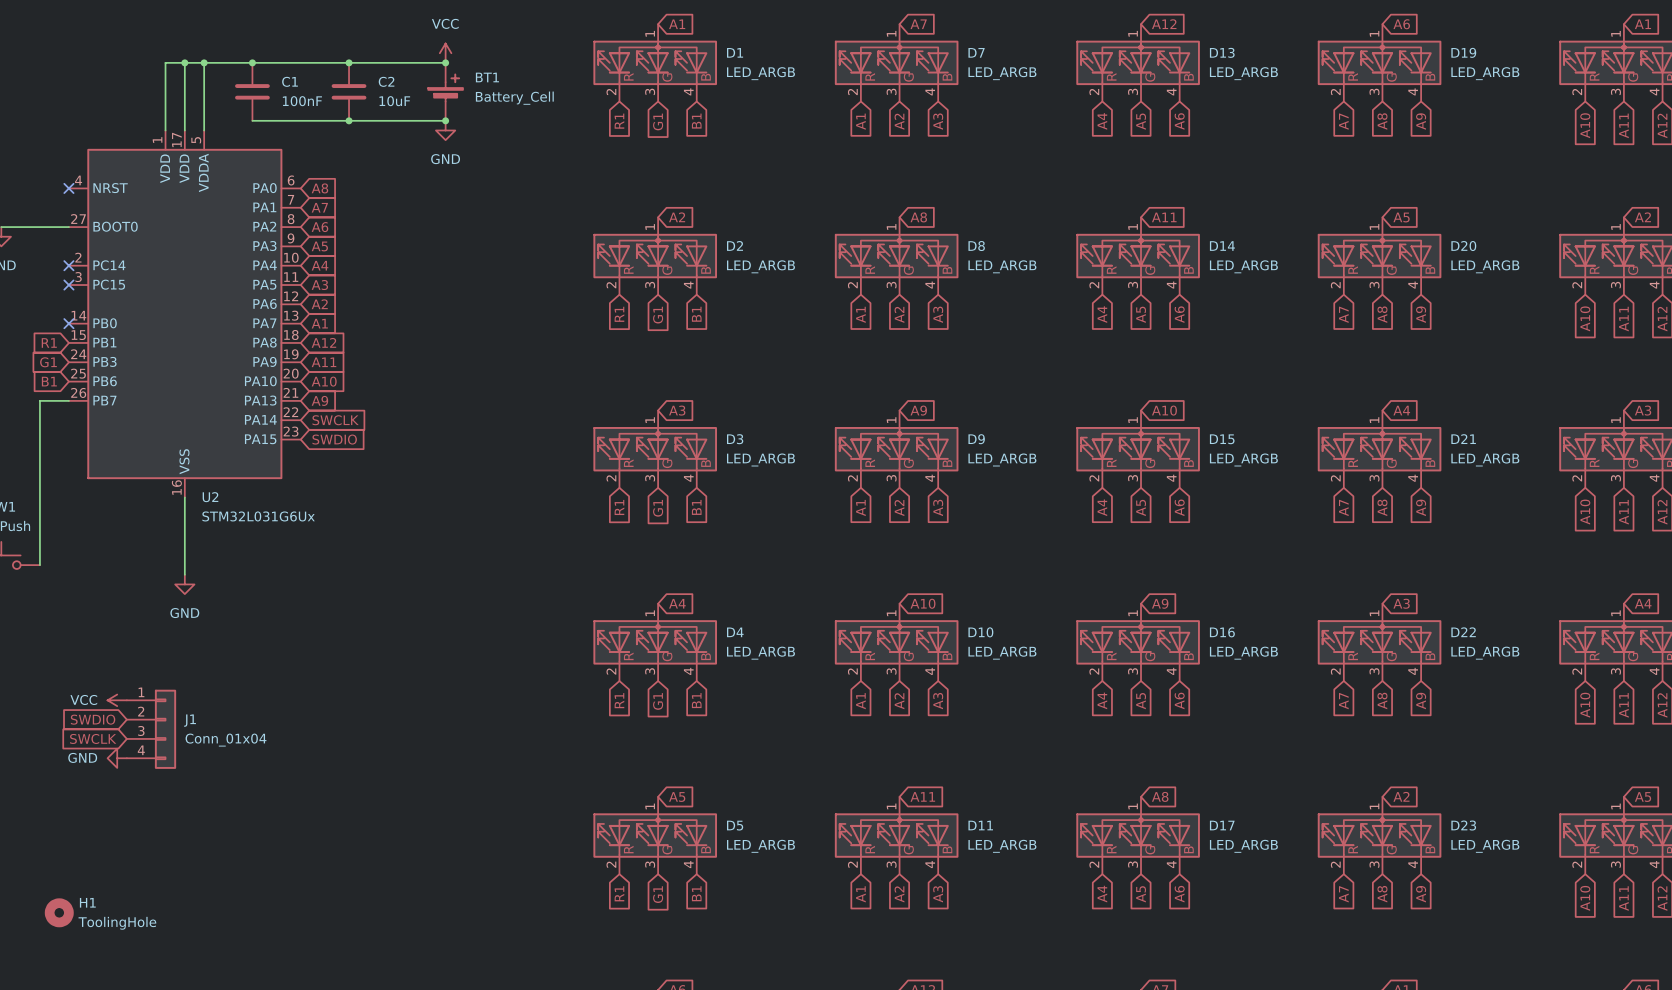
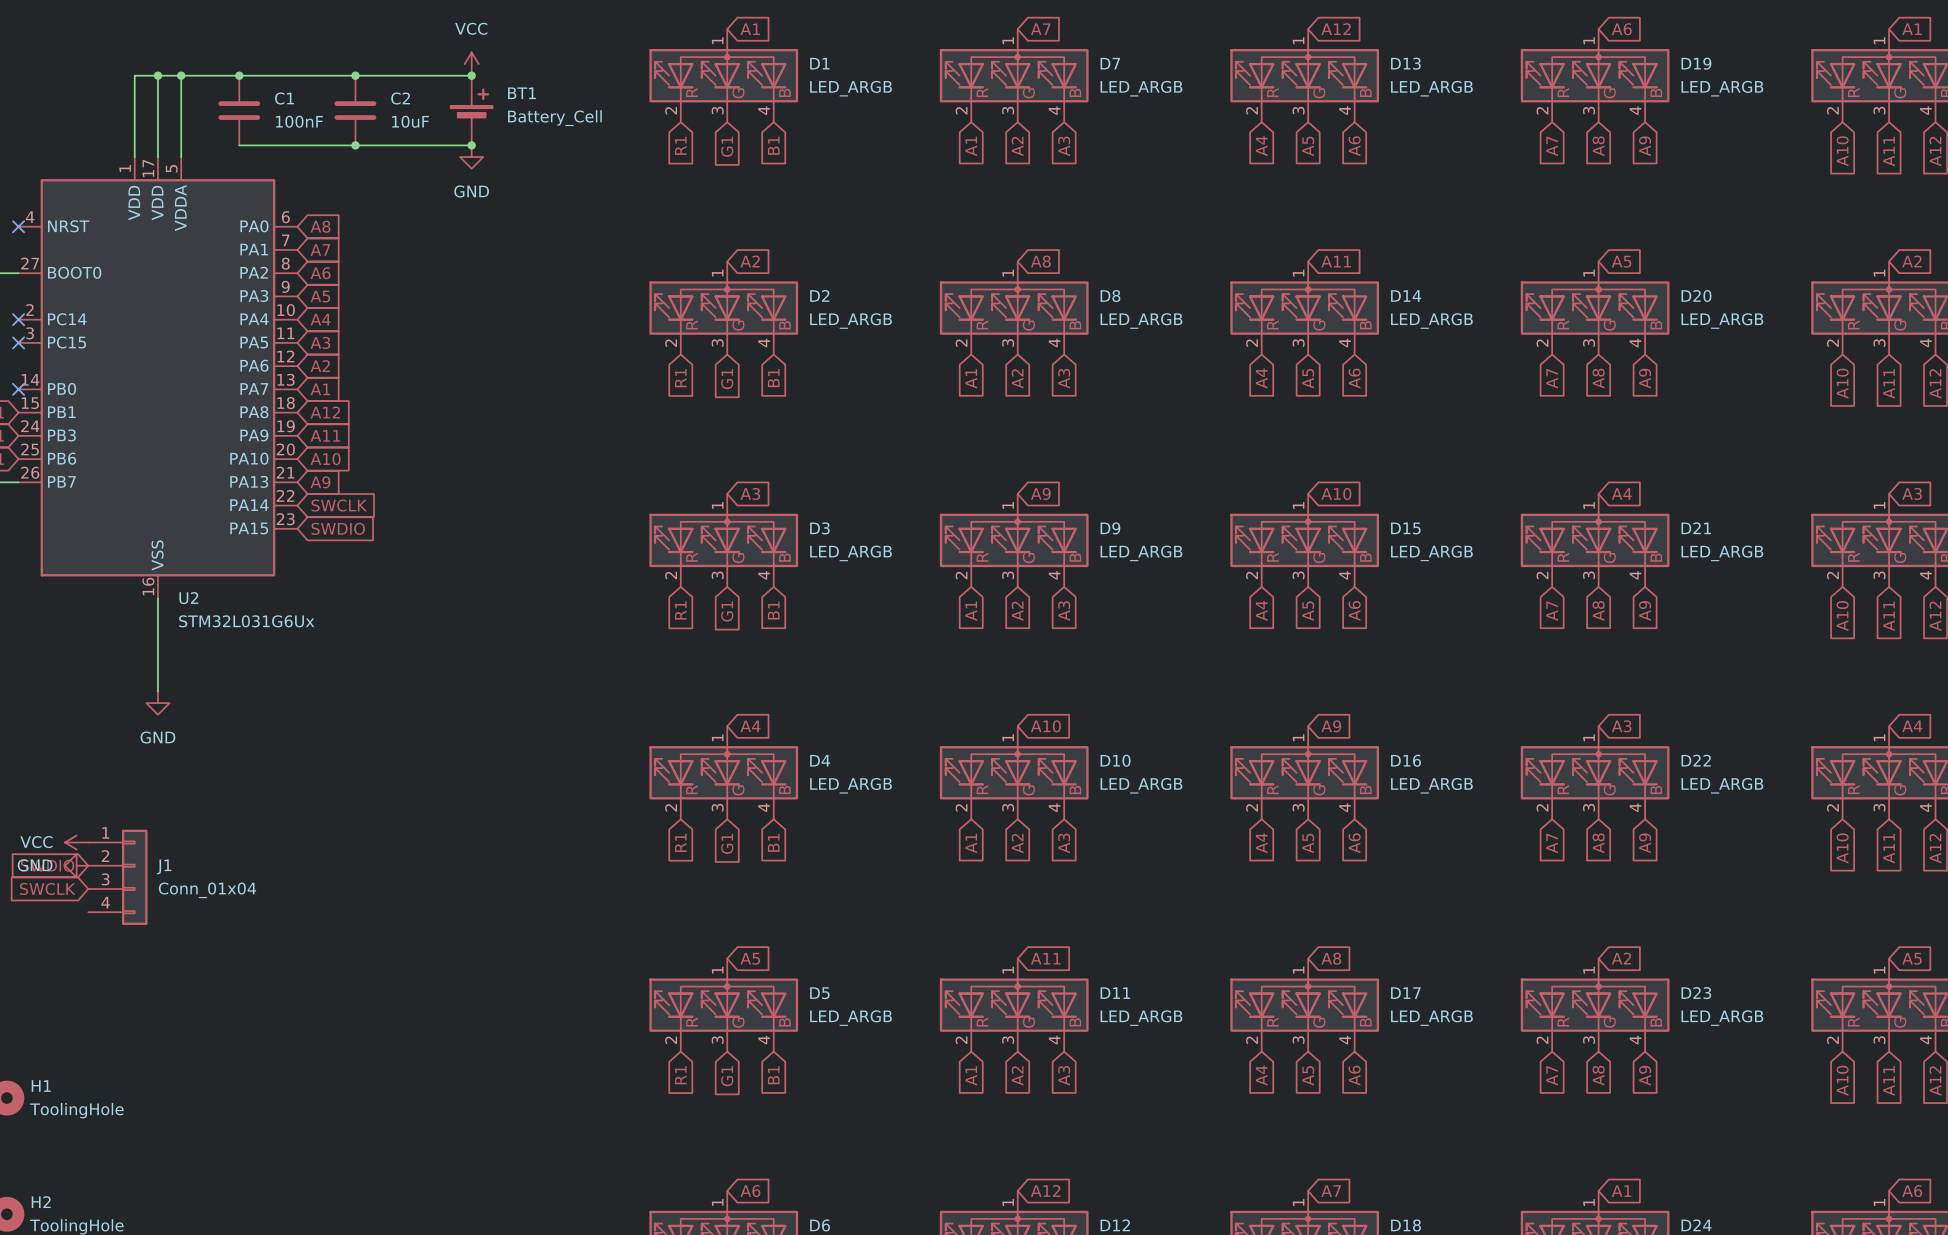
power symbol position: GND (117, 758) -> GND (76, 865)

